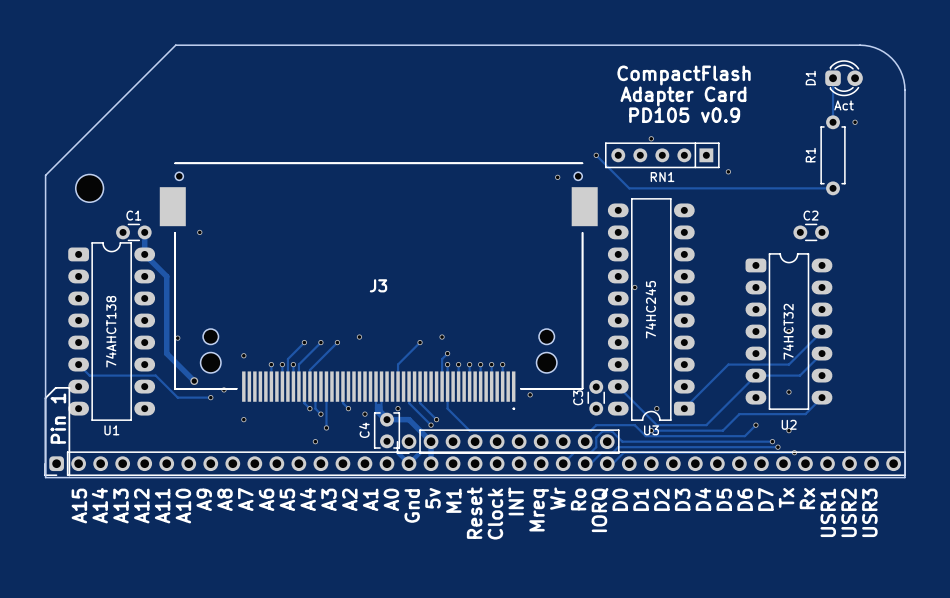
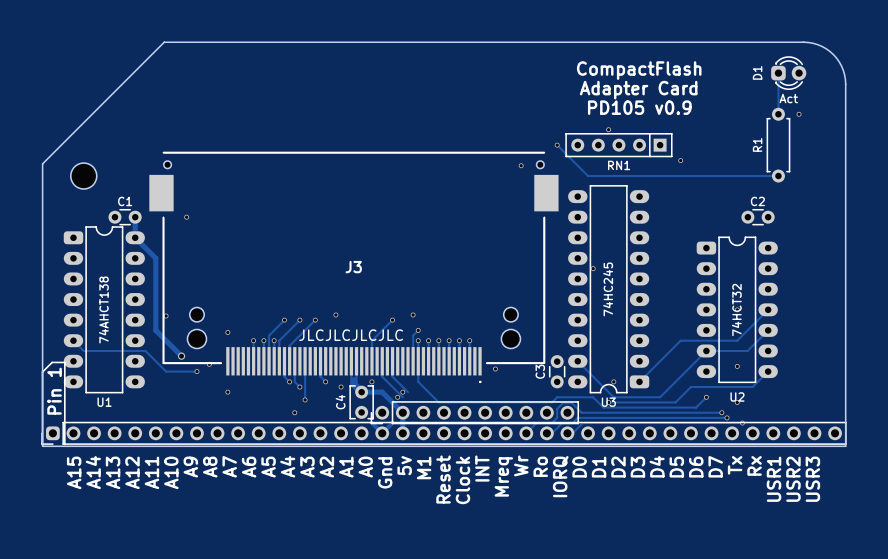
text: none -> JLCJLCJLCJLC (351, 335)
via: none -> (402, 392)
via: (436, 419) -> none
via: none -> (397, 397)
via: (431, 425) -> none

